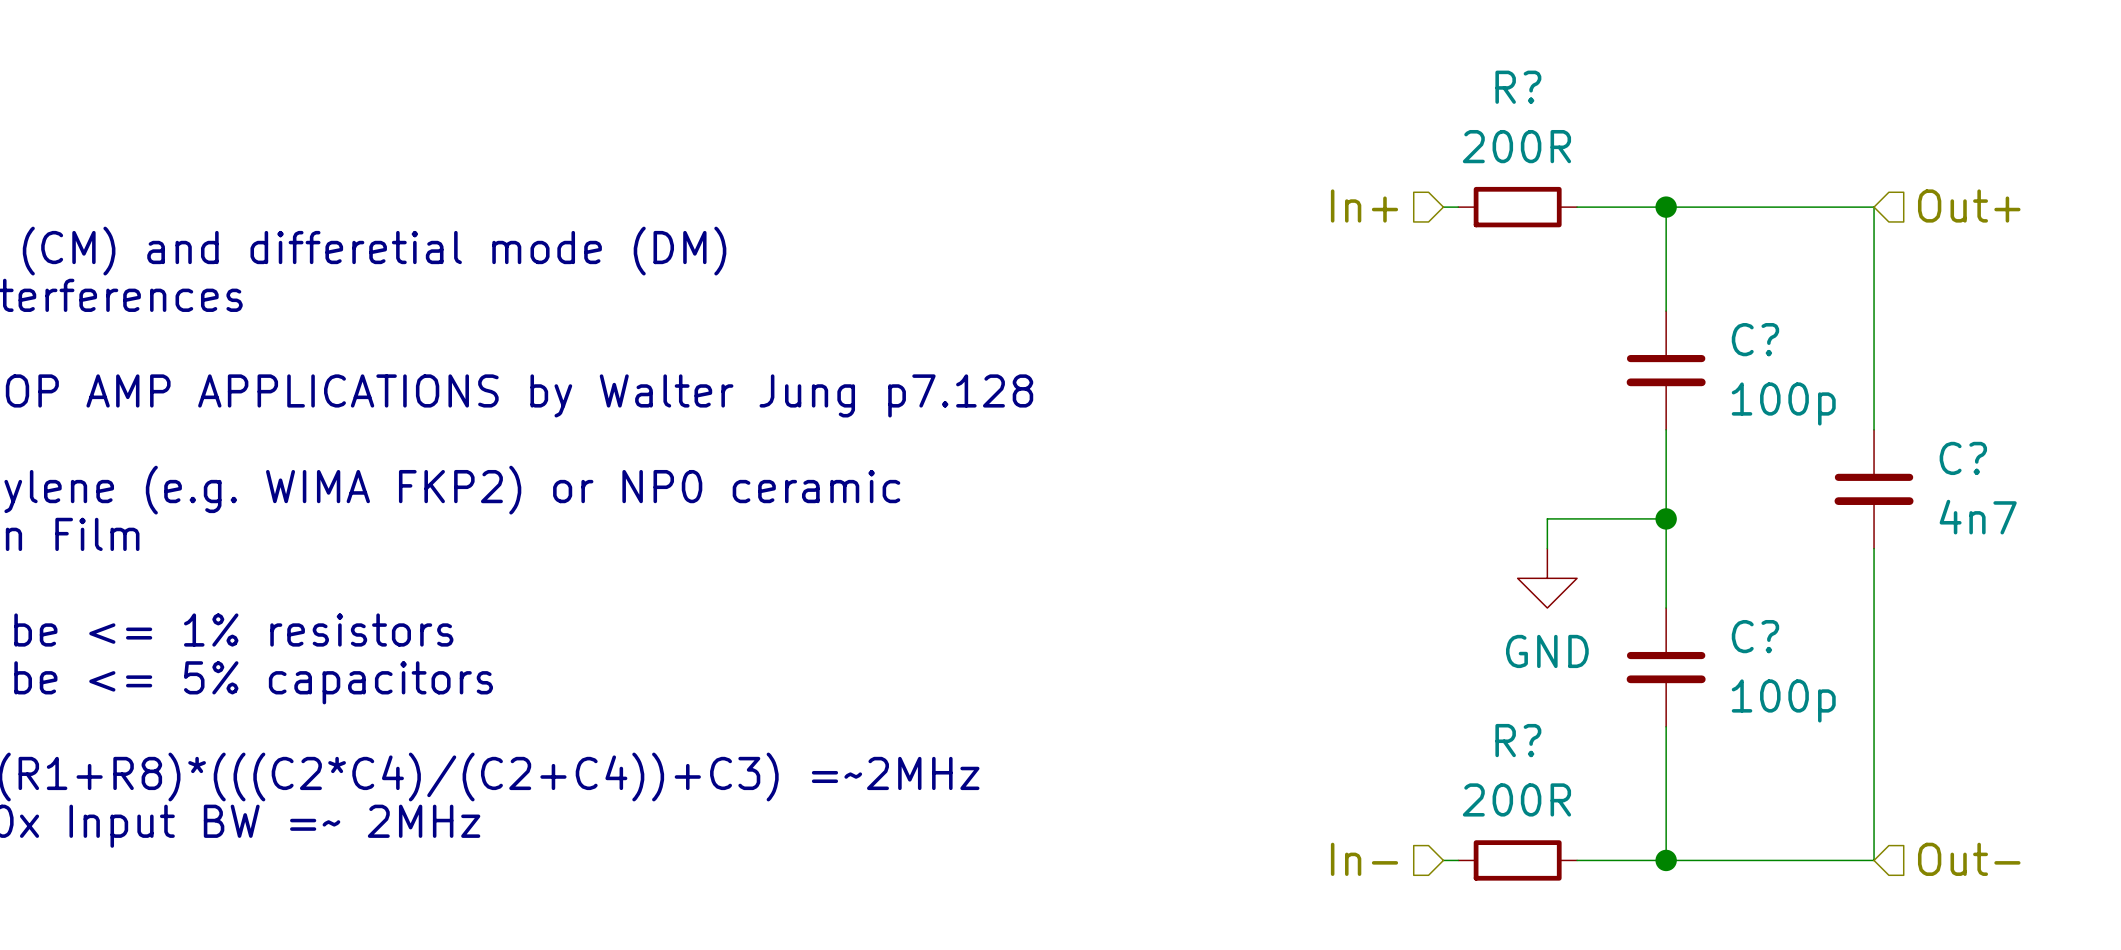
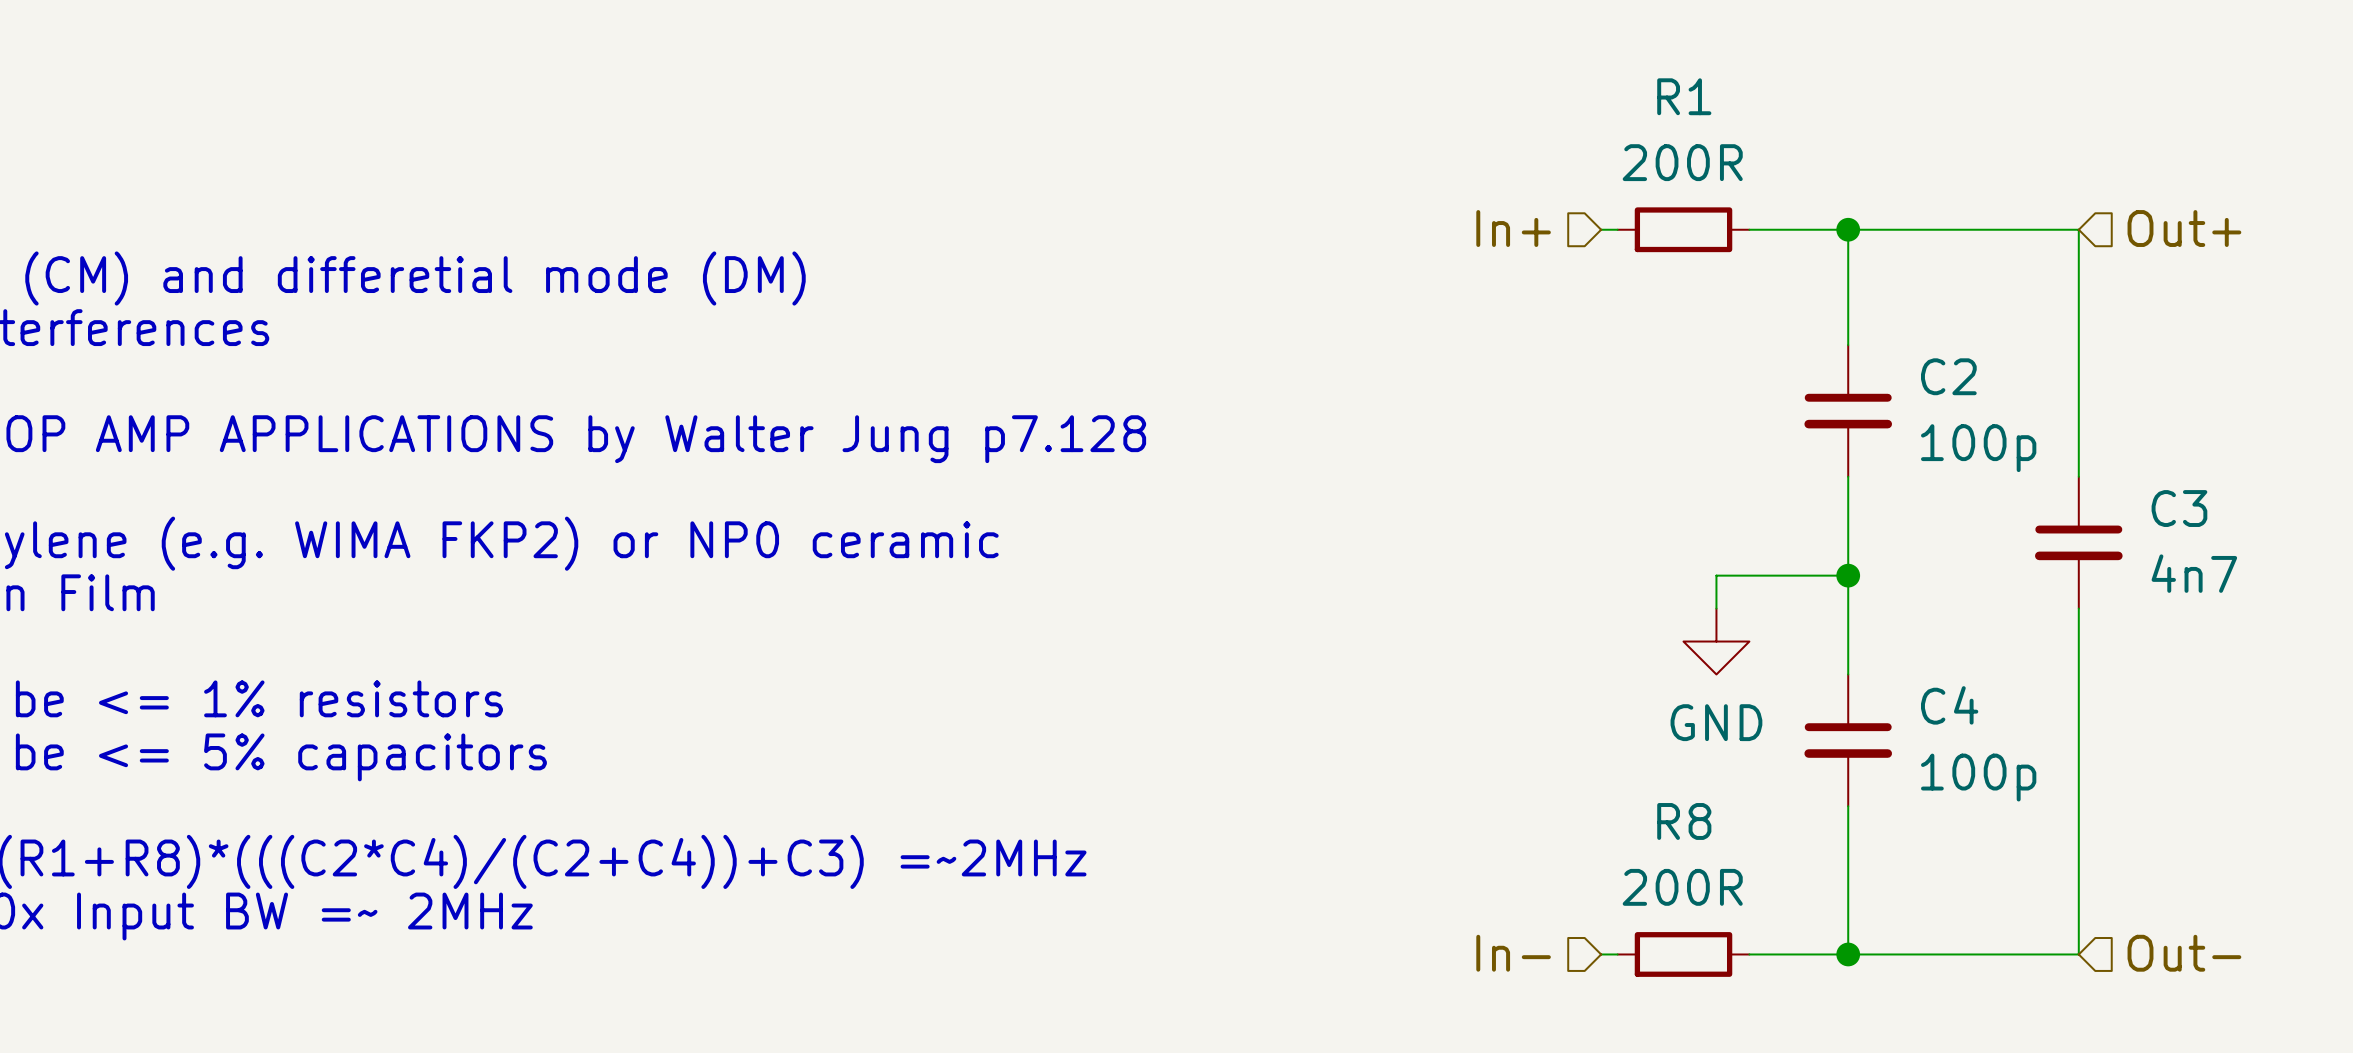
R? name: R? (1518, 87) -> R1 (1684, 96)
C? name: C? (1755, 339) -> C2 (1948, 376)
C? name: C? (1963, 458) -> C3 (2179, 508)
C? name: C? (1755, 636) -> C4 (1949, 705)
R? name: R? (1518, 740) -> R8 (1684, 821)

